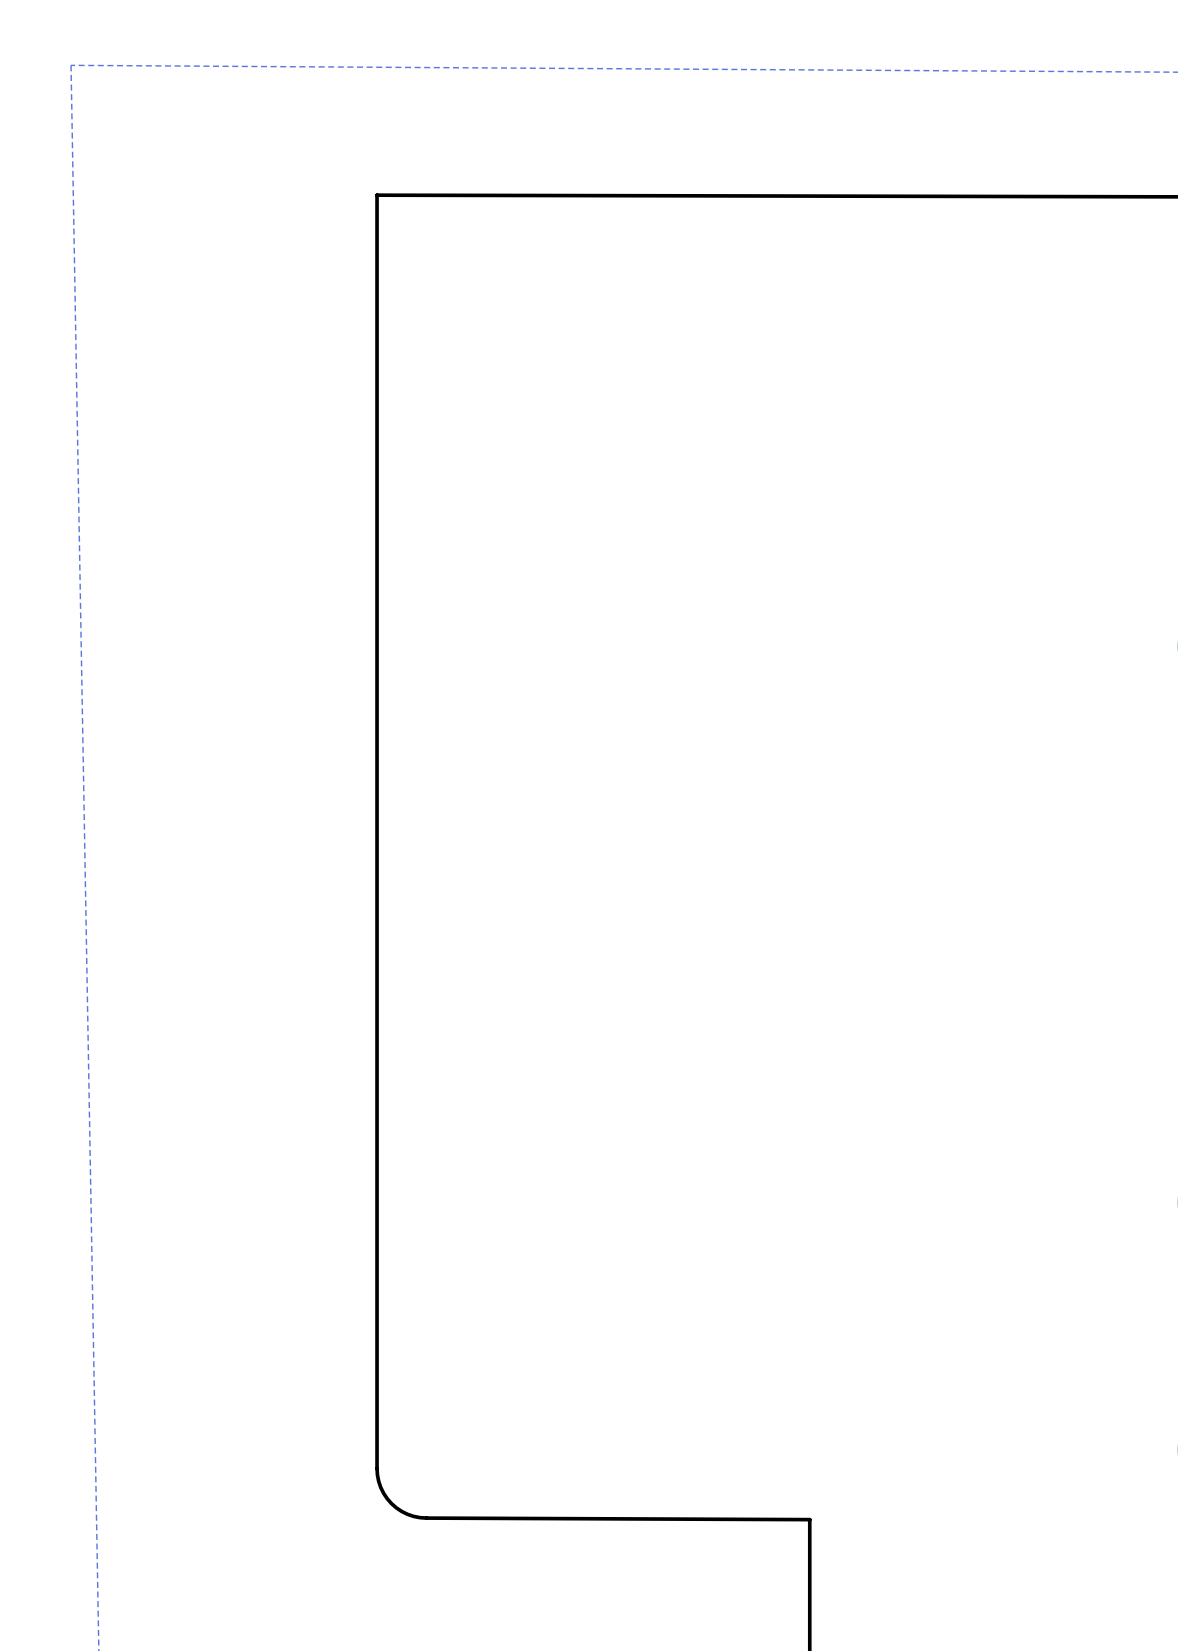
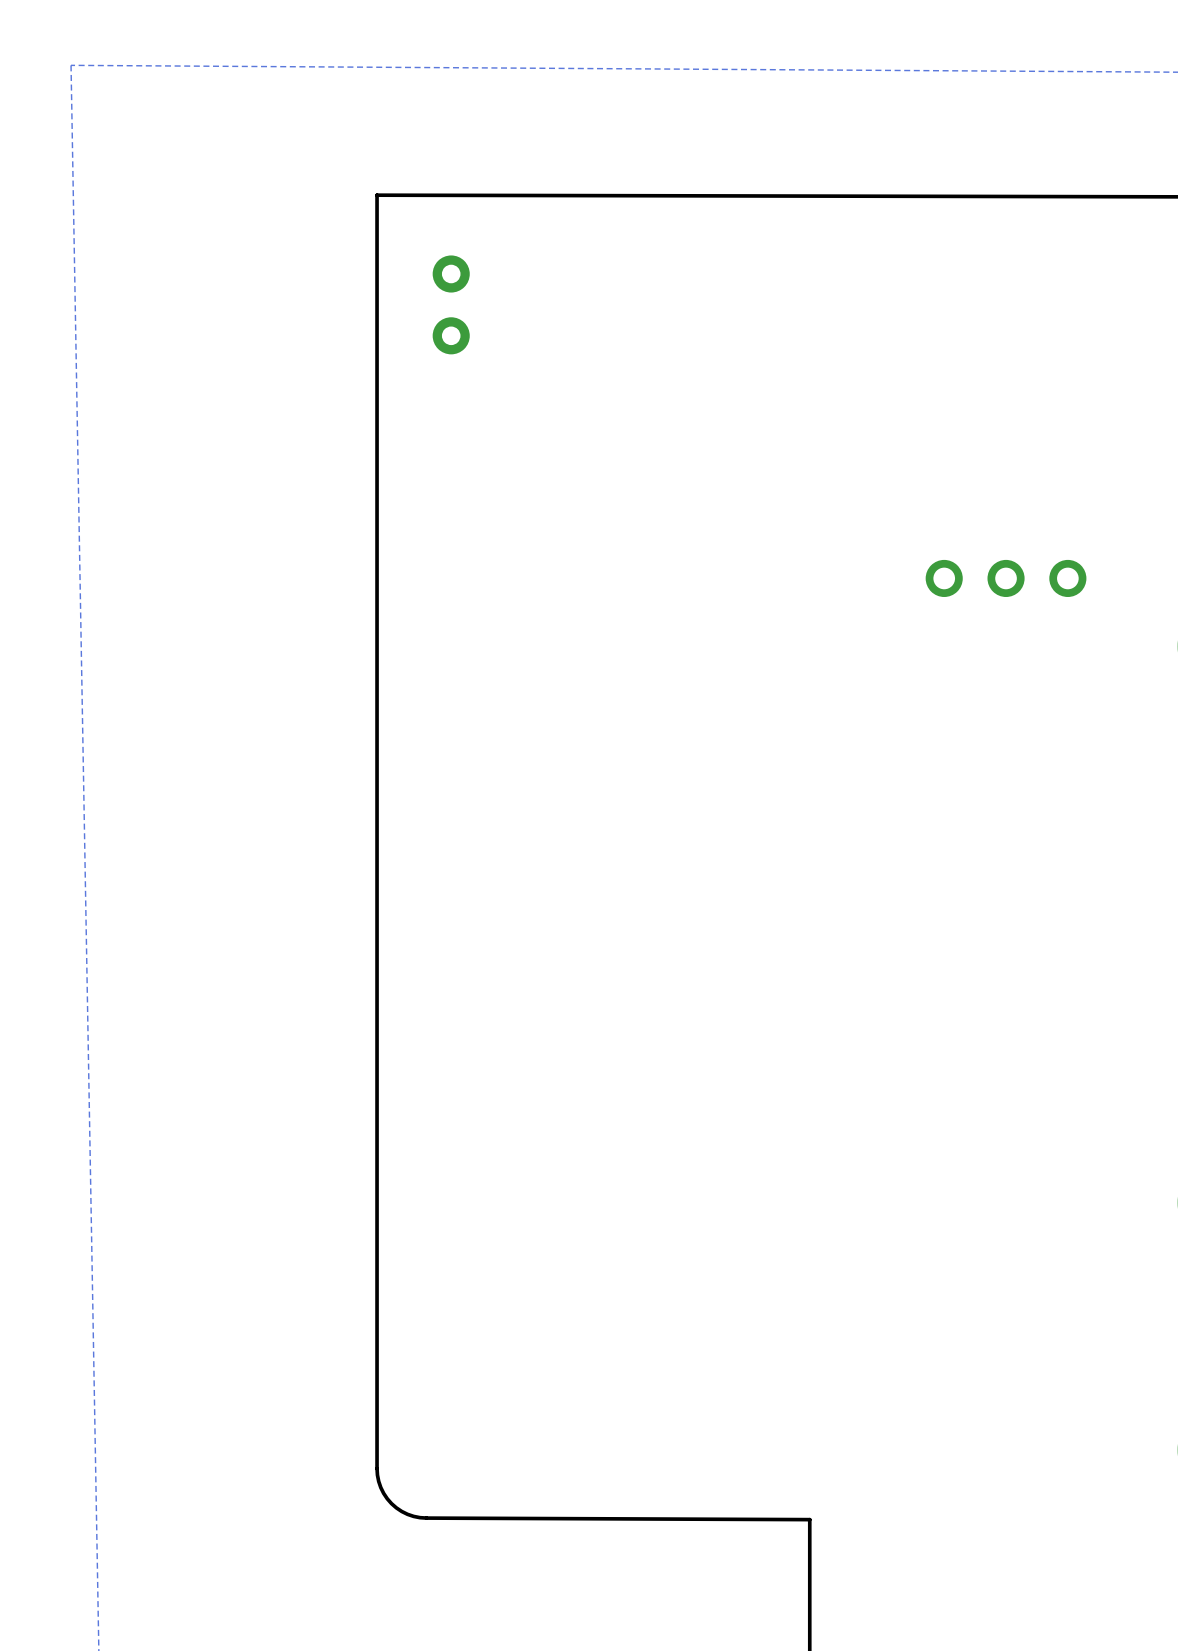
part: none -> (451, 304)
part: none -> (1006, 578)

